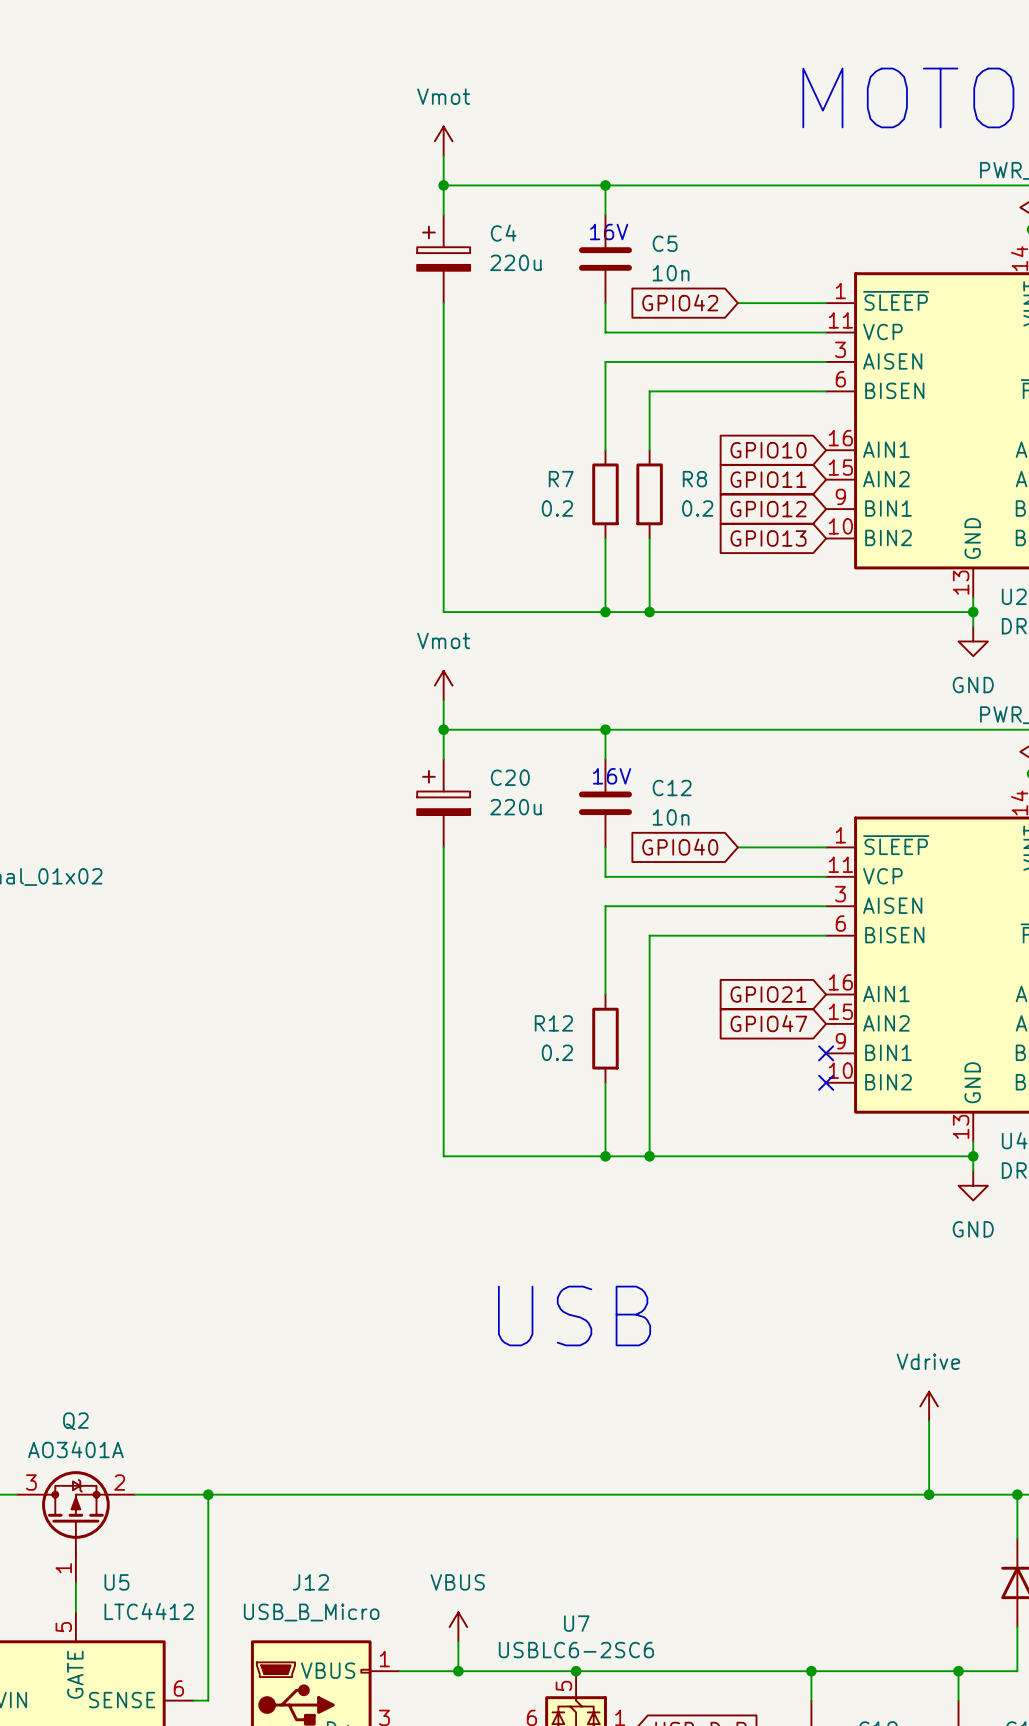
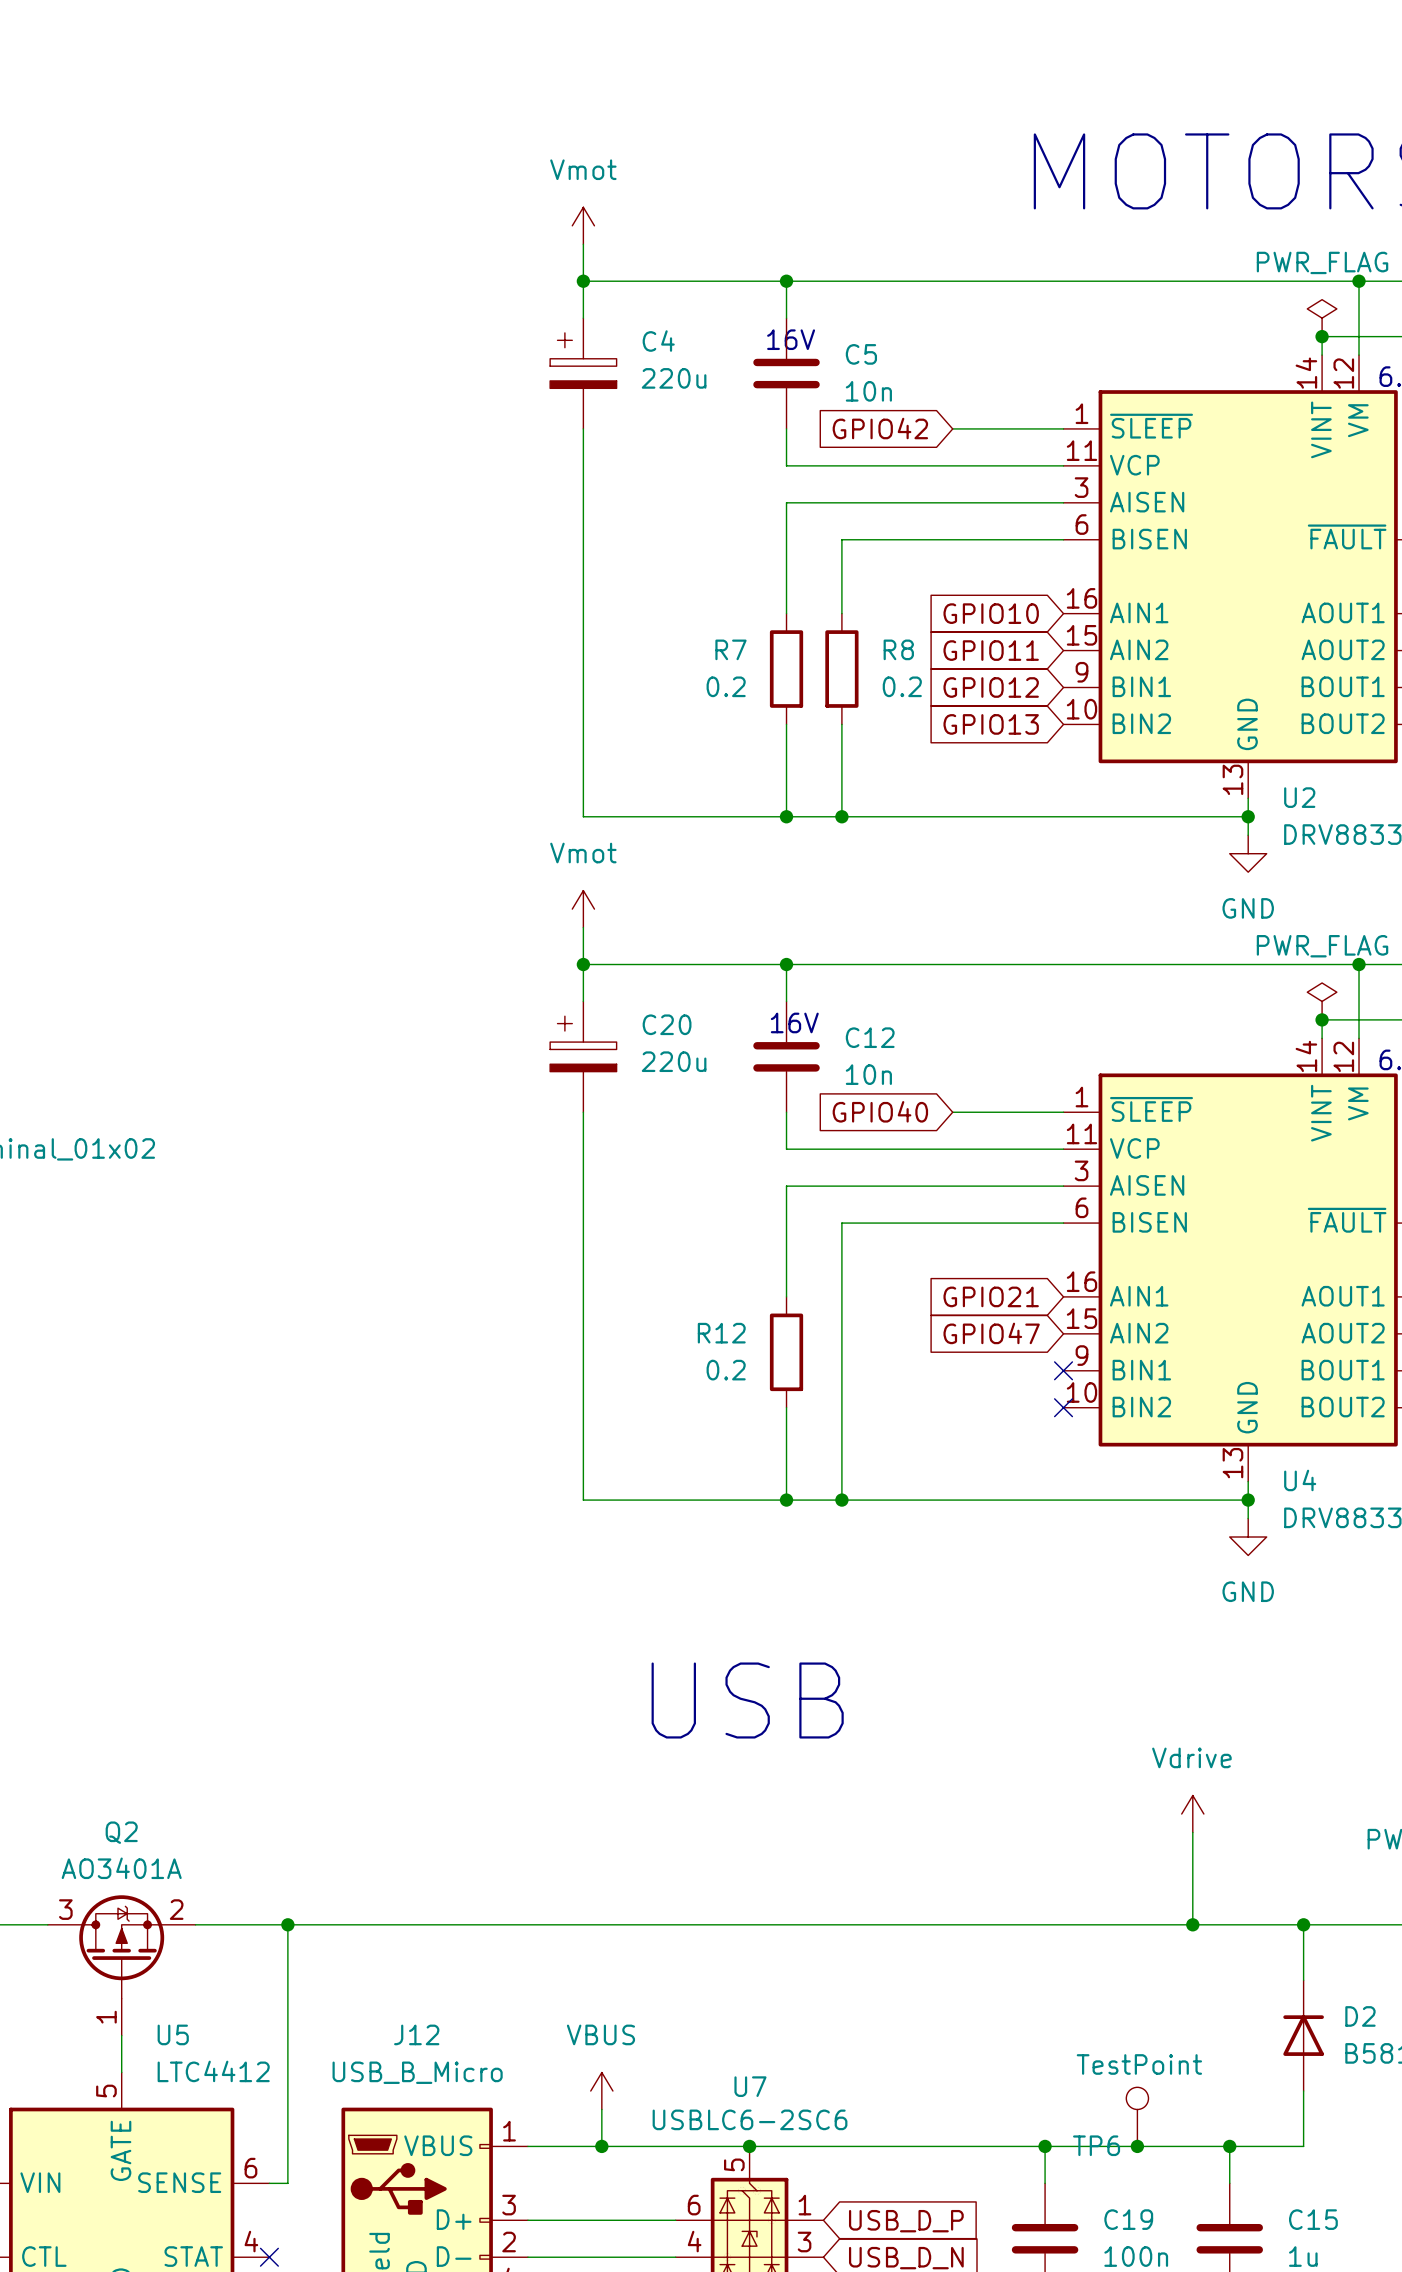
TP6: none -> TestPoint (1137, 2116)
junction: none -> (1137, 2146)

